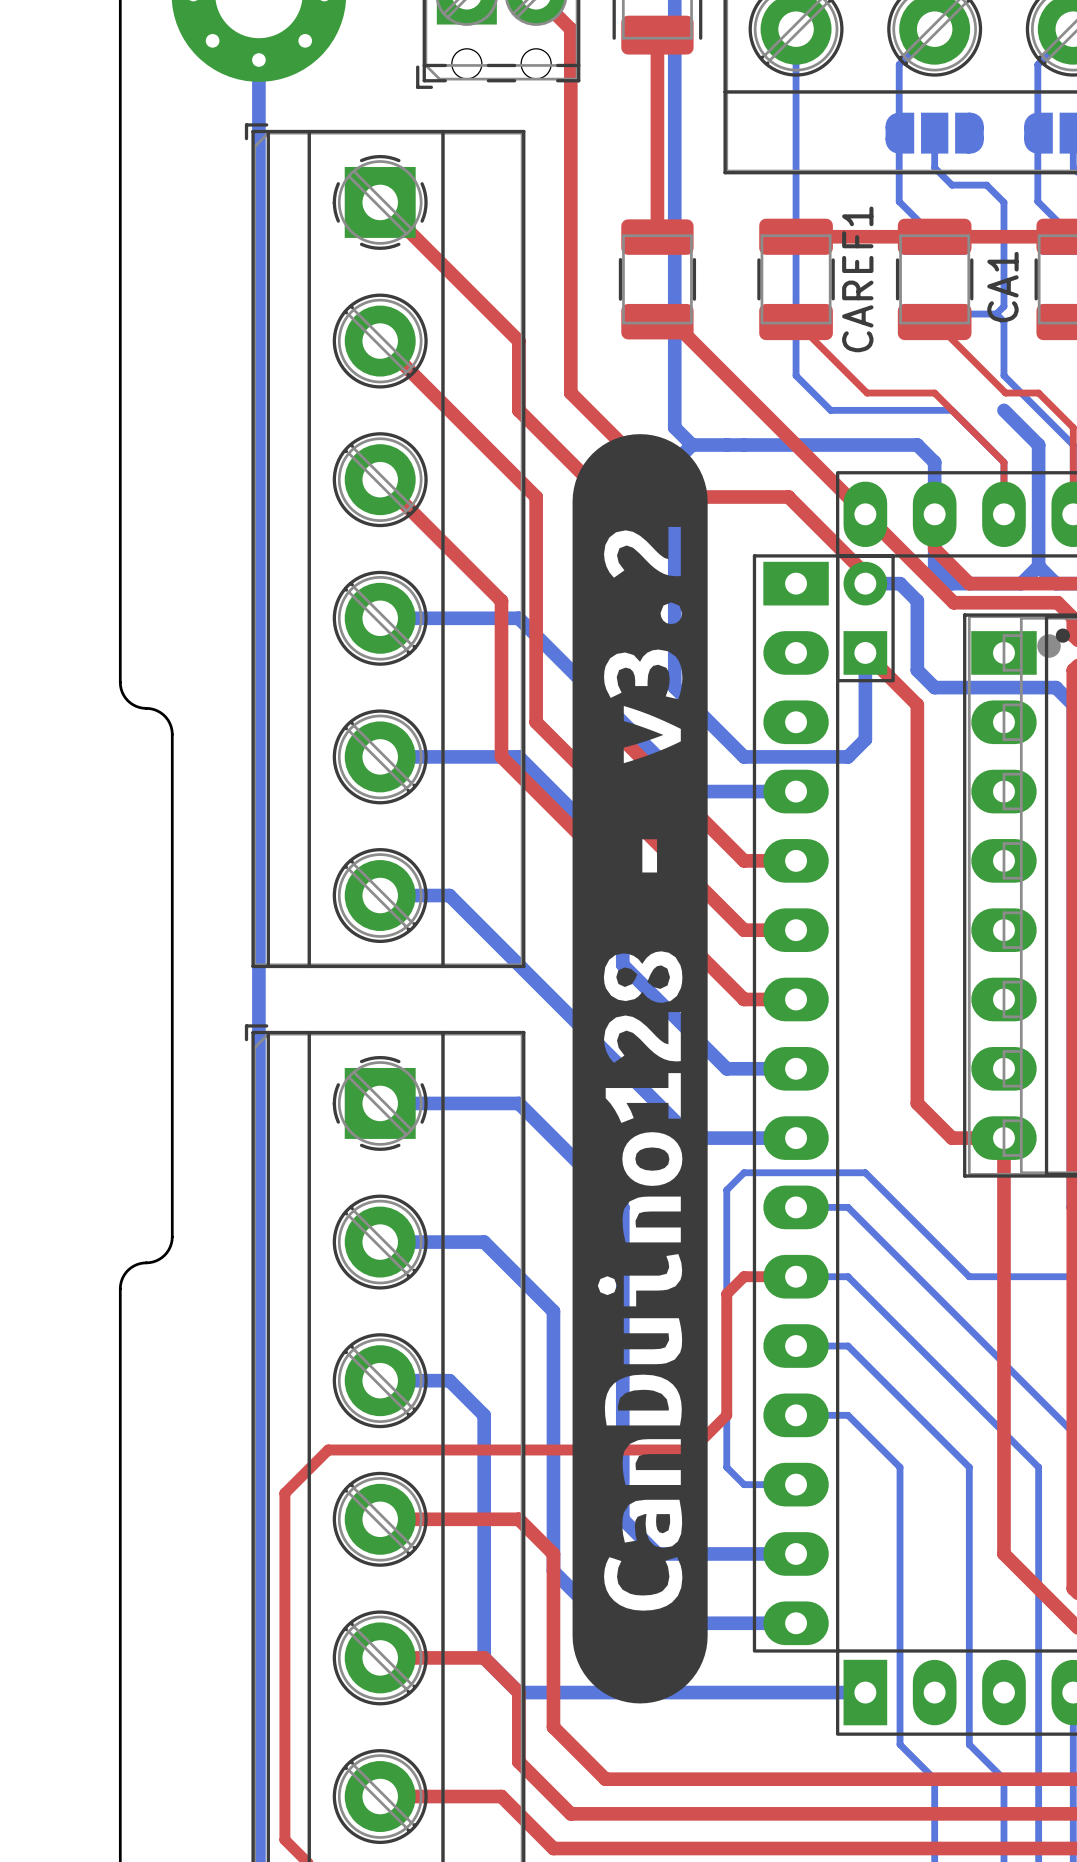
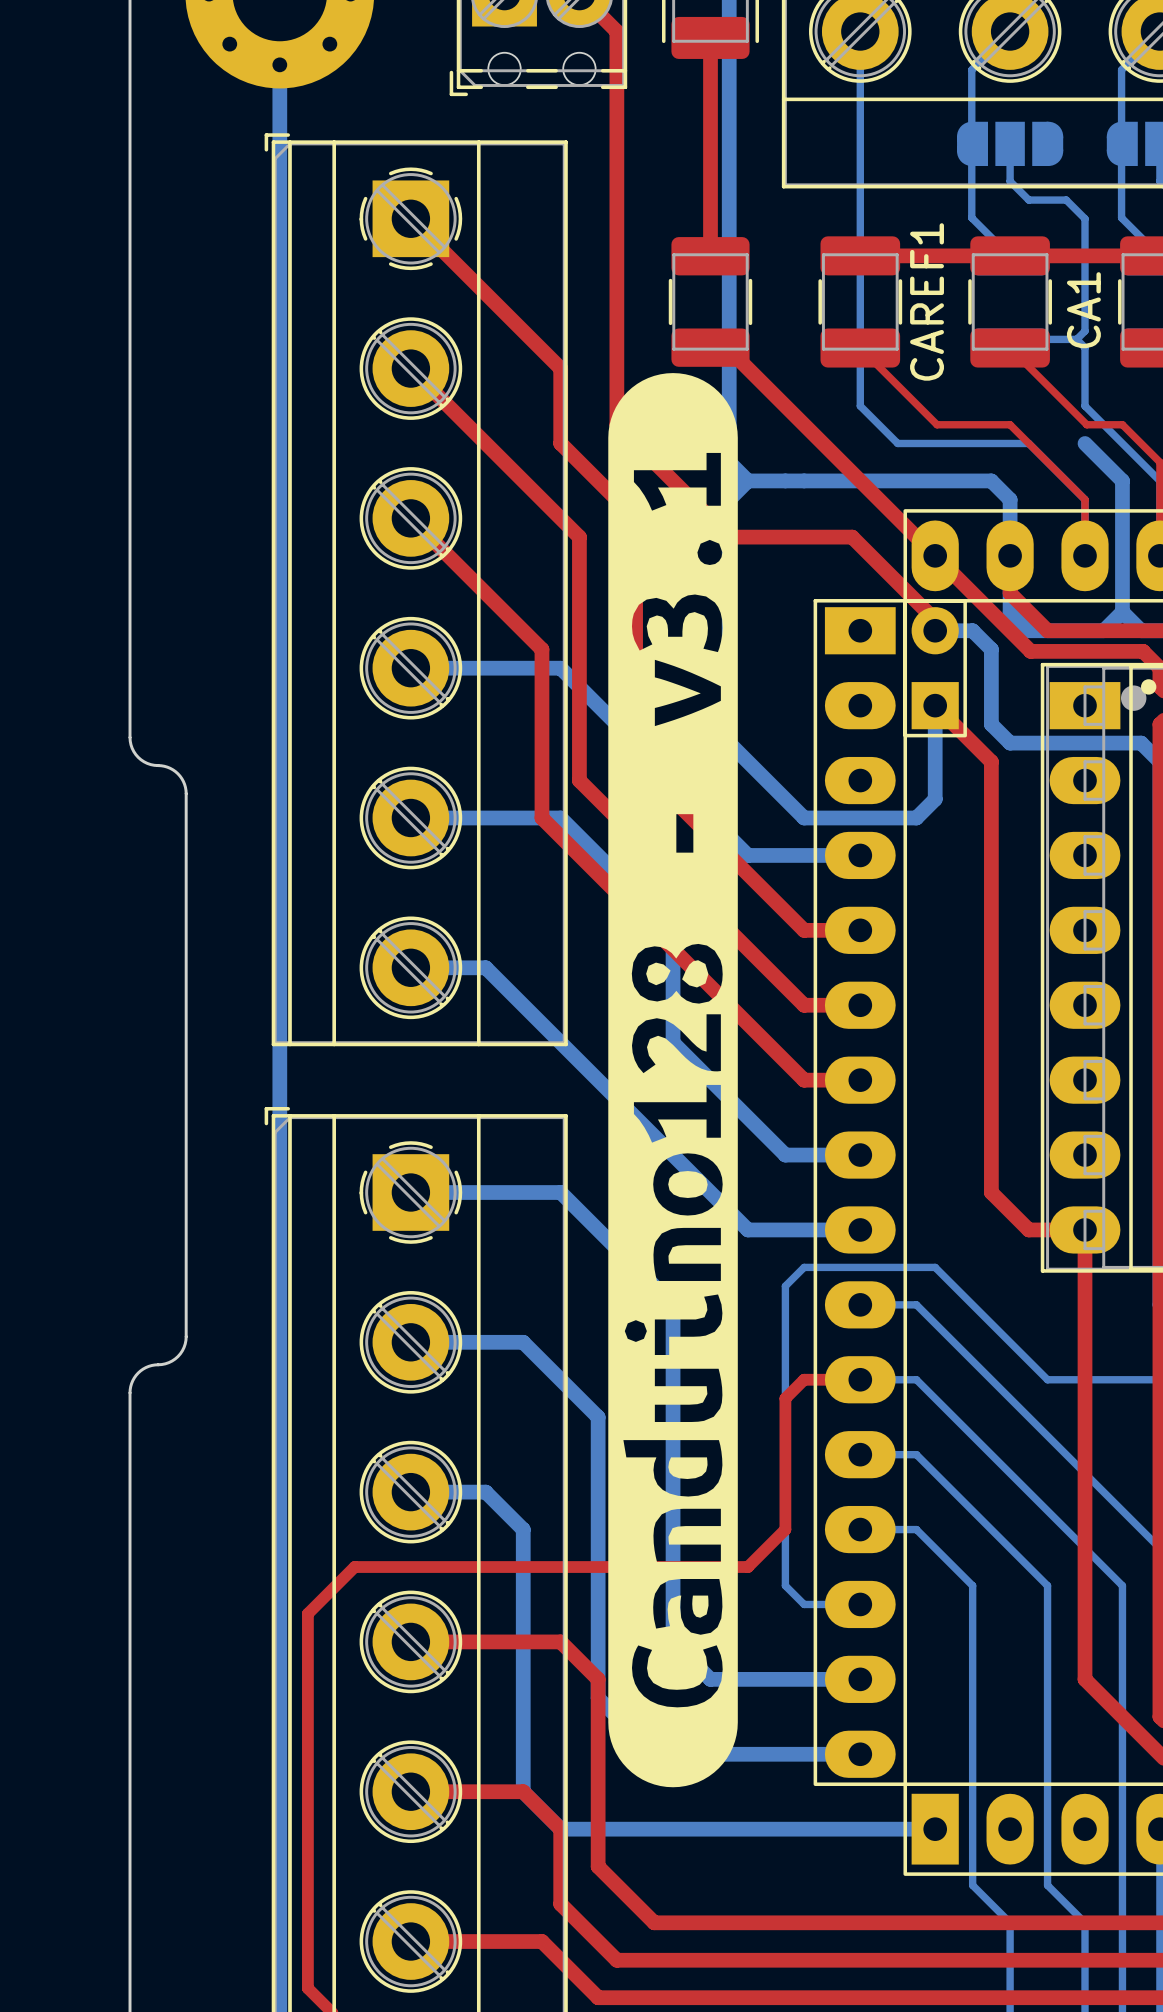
drawing: none -> [608, 373, 738, 1788]
drawing: [572, 434, 708, 1704] -> none

